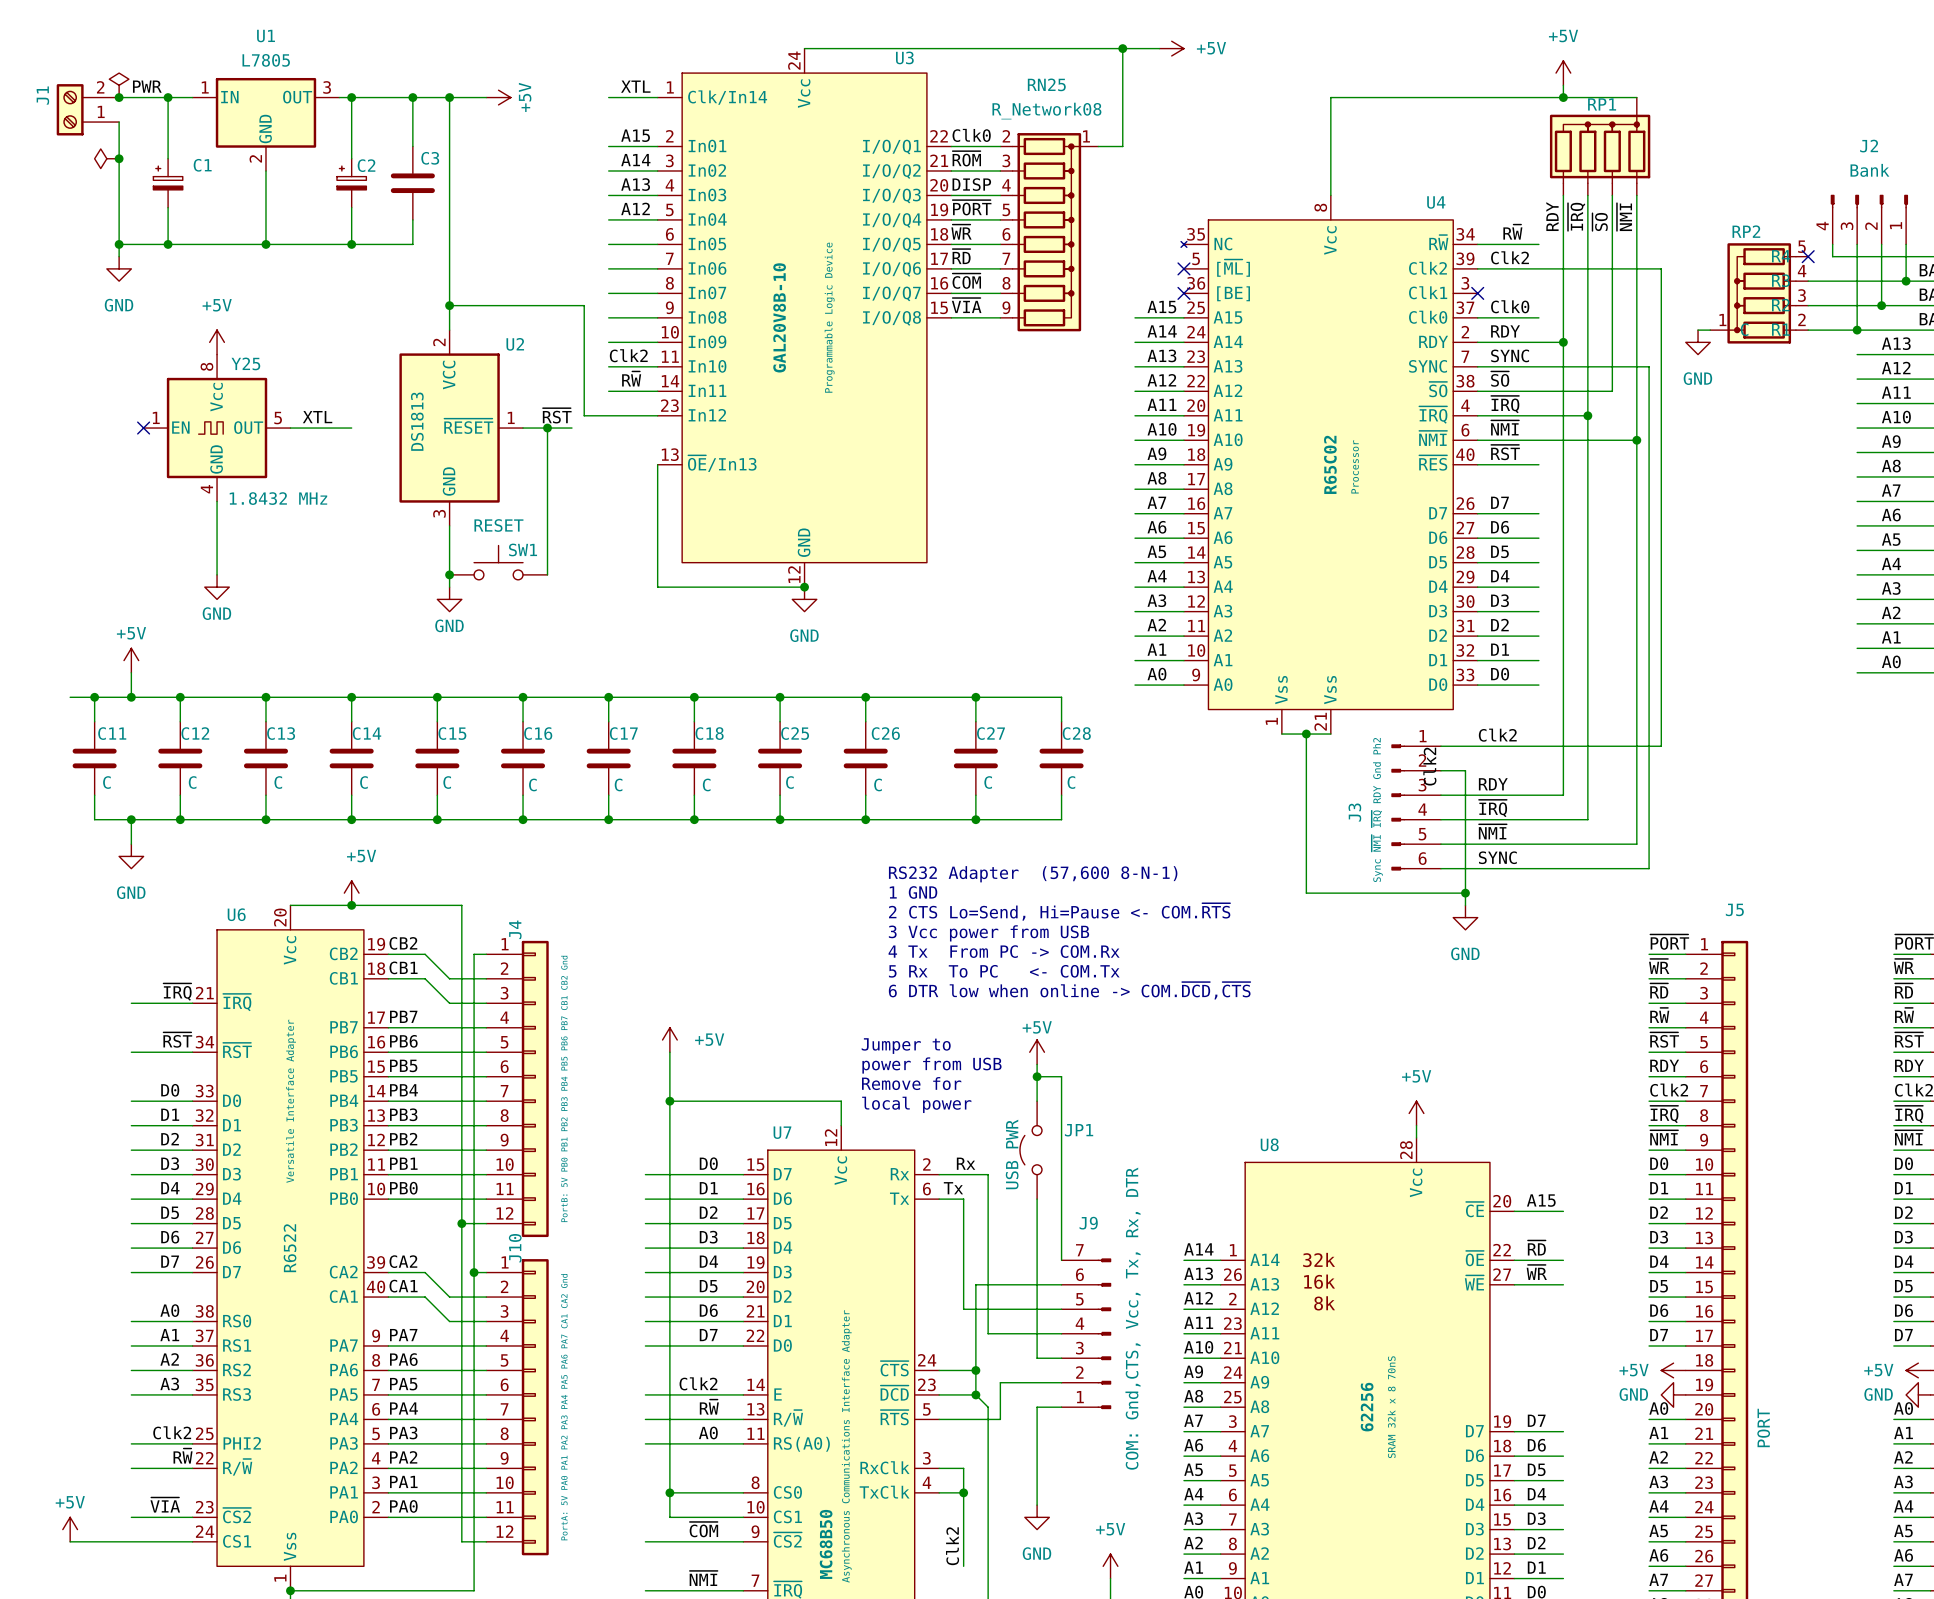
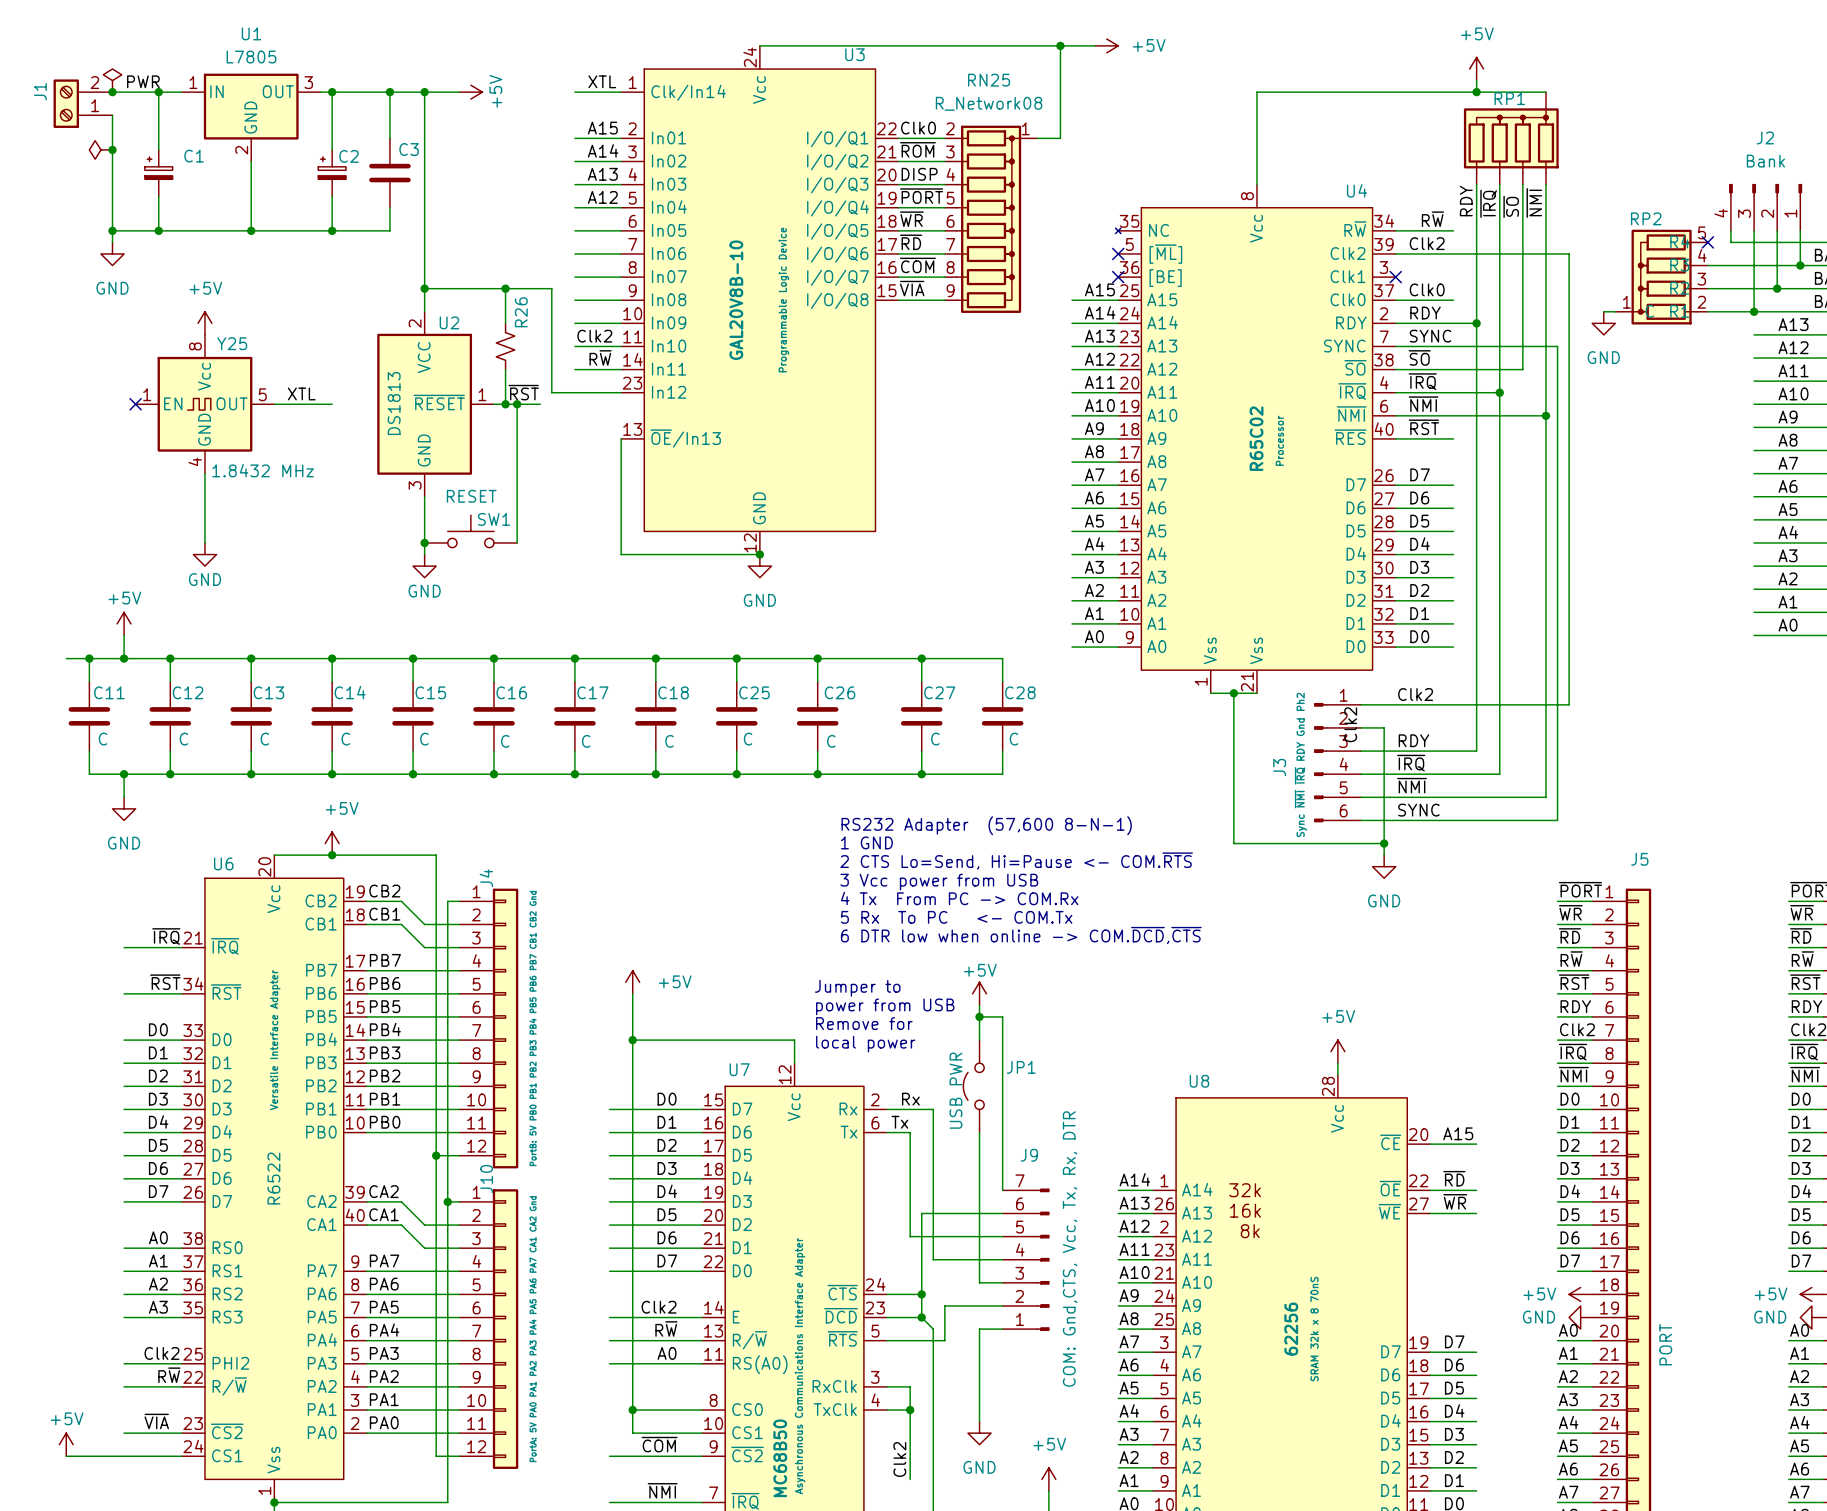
wire: none -> (505, 288) (505, 323)
junction: none -> (505, 288)
U2 name position: U2 (515, 344) -> U2 (449, 322)
R26: none -> (505, 346)
wire: none -> (505, 369) (505, 404)
junction: none -> (505, 404)

